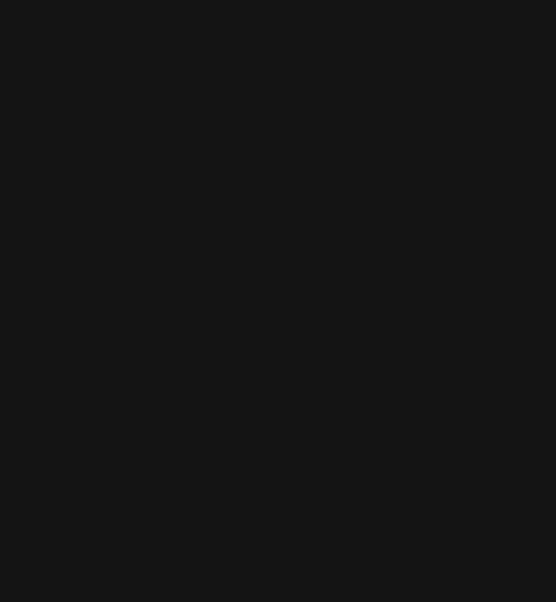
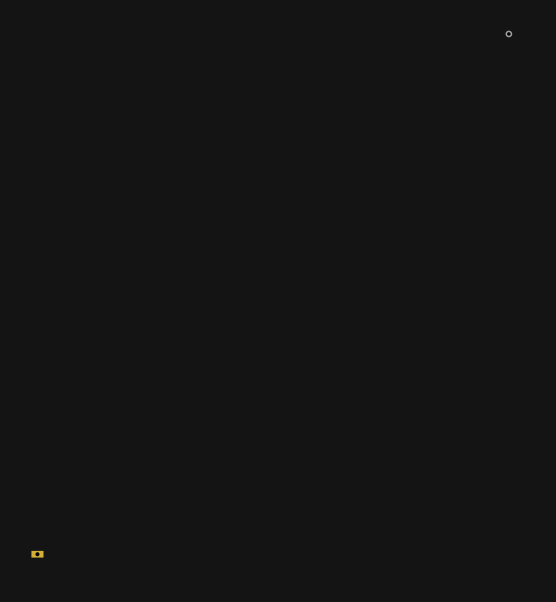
part: none -> (508, 33)
part: none -> (37, 554)

